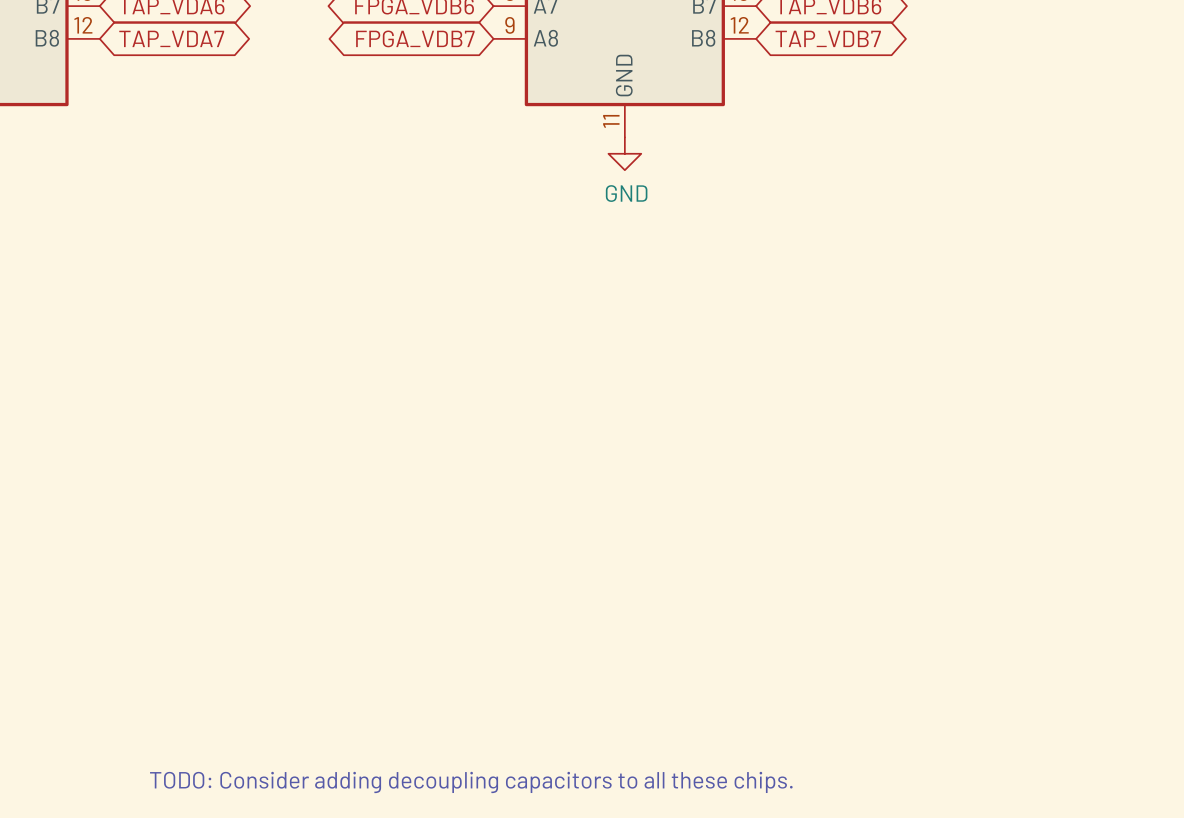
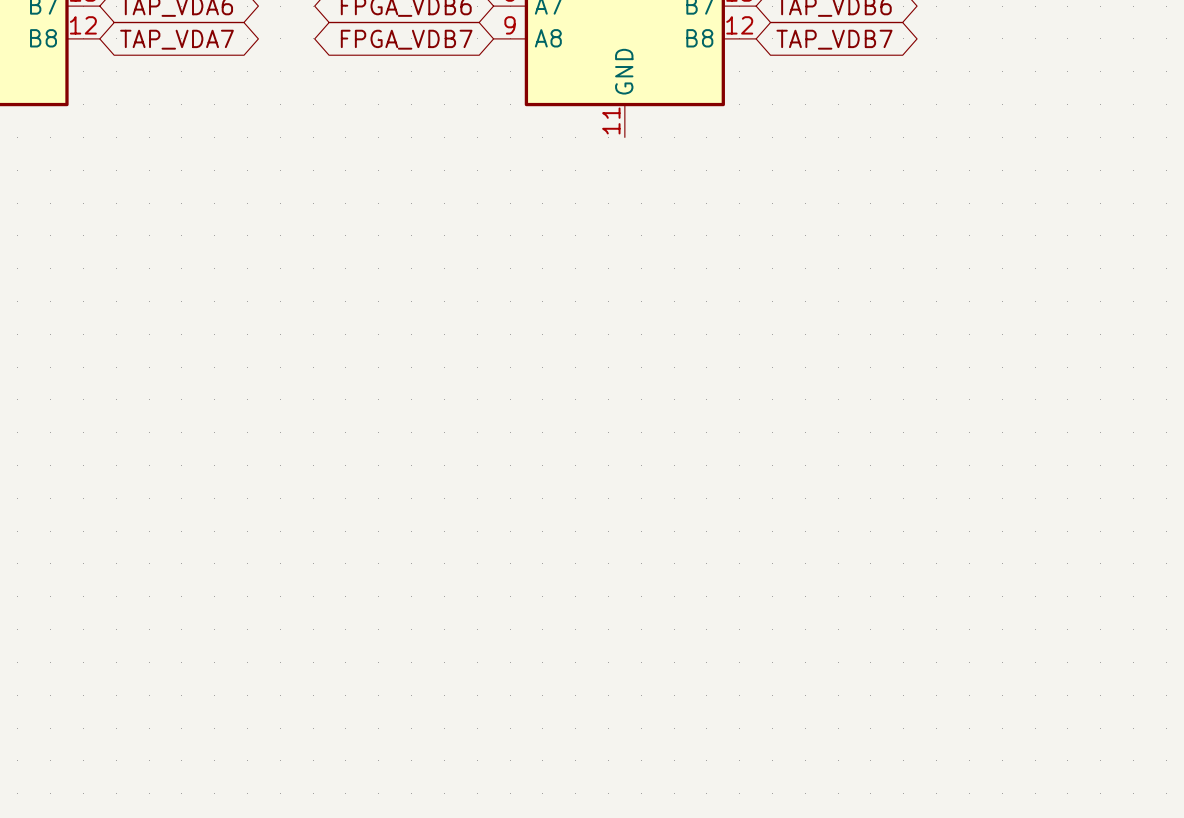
power symbol: GND (624, 153) -> none
text: TODO: Consider adding decoupling capacitors to all these chips. (471, 782) -> none

